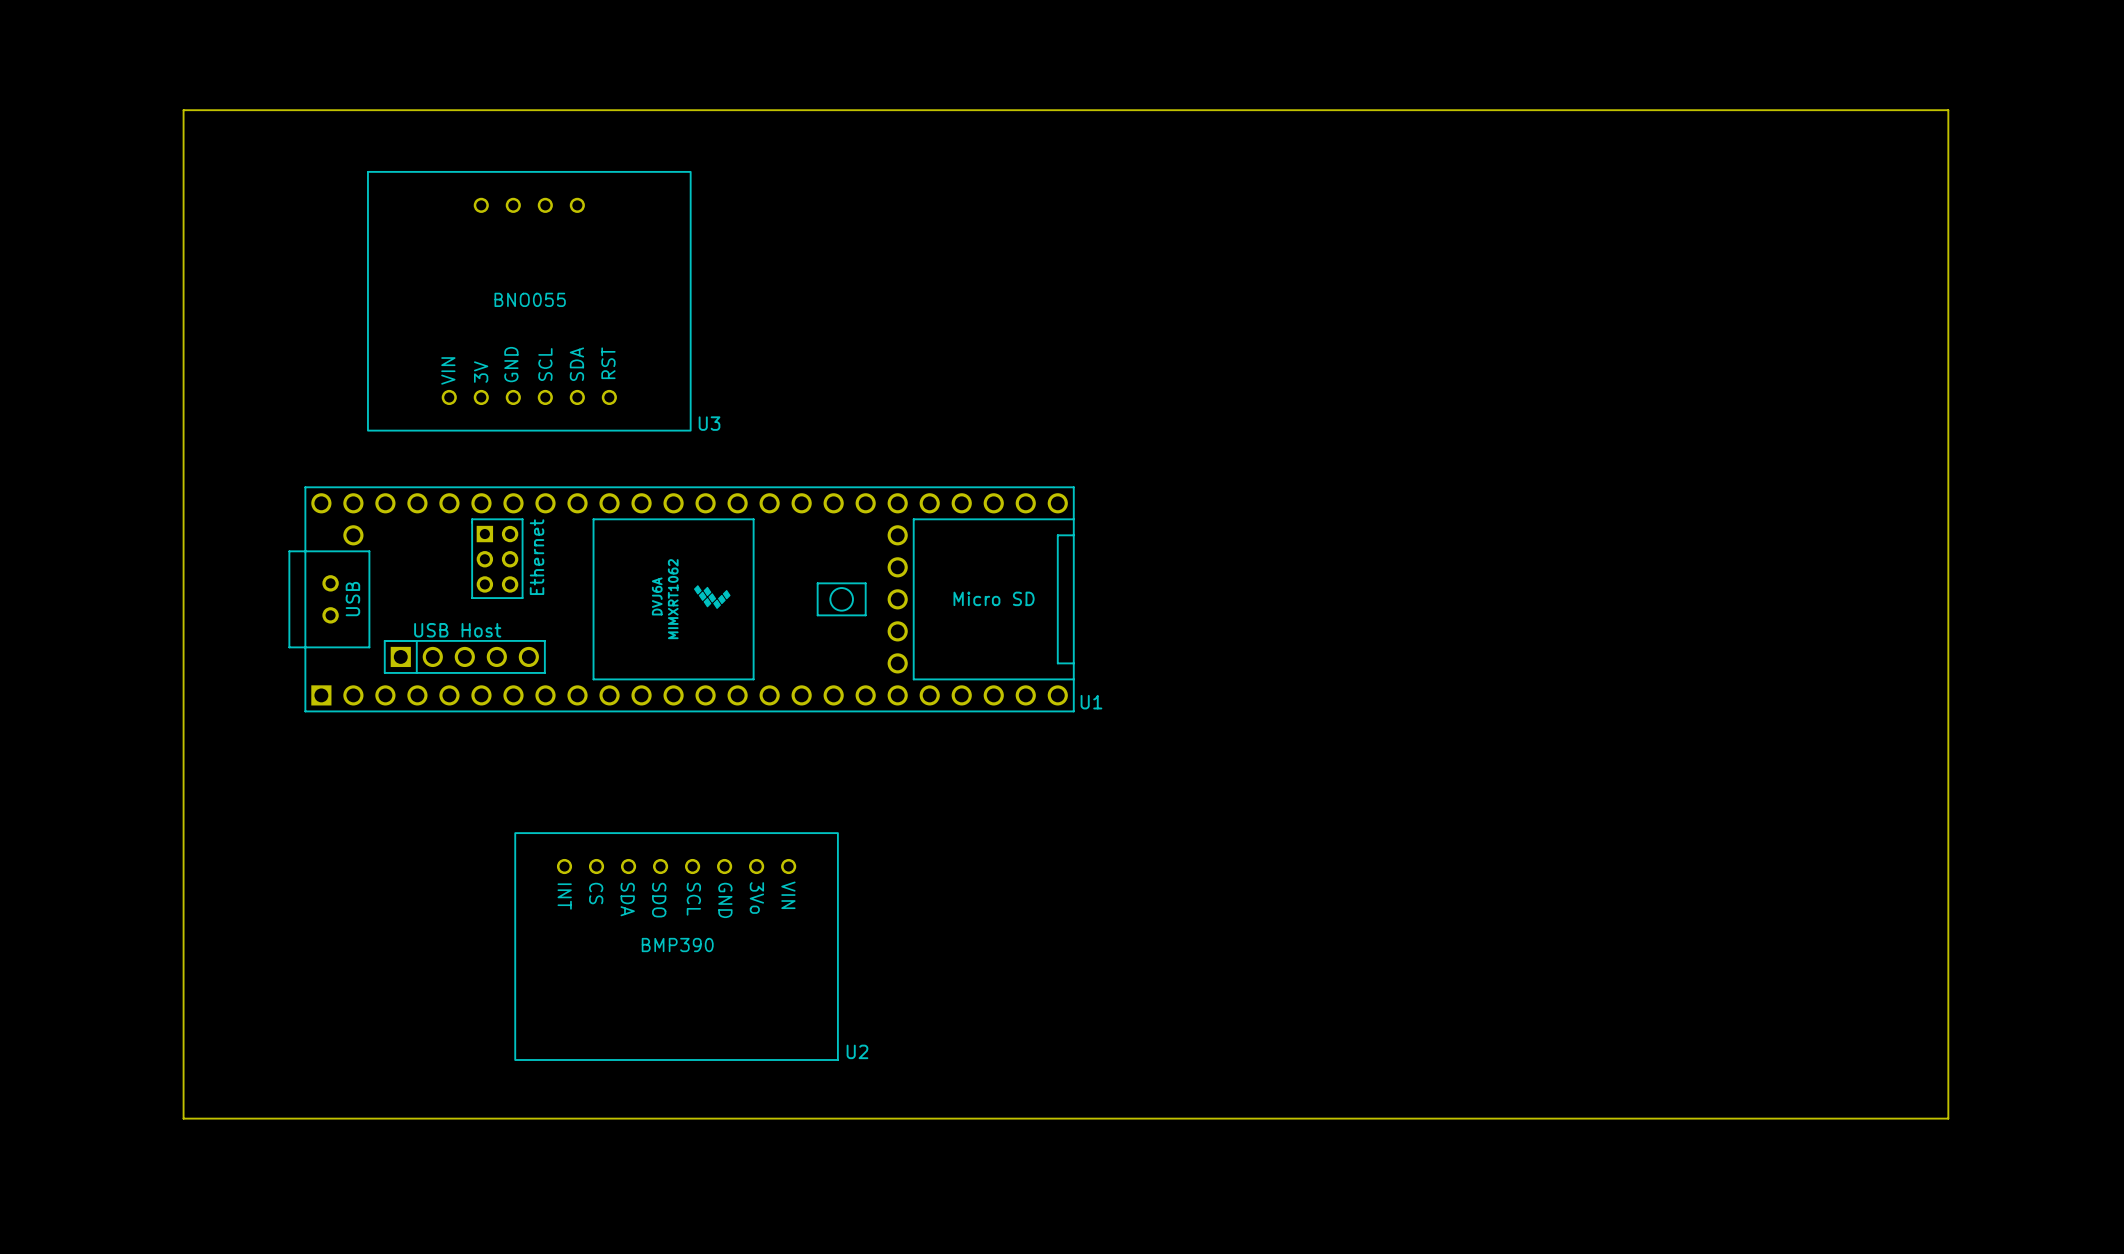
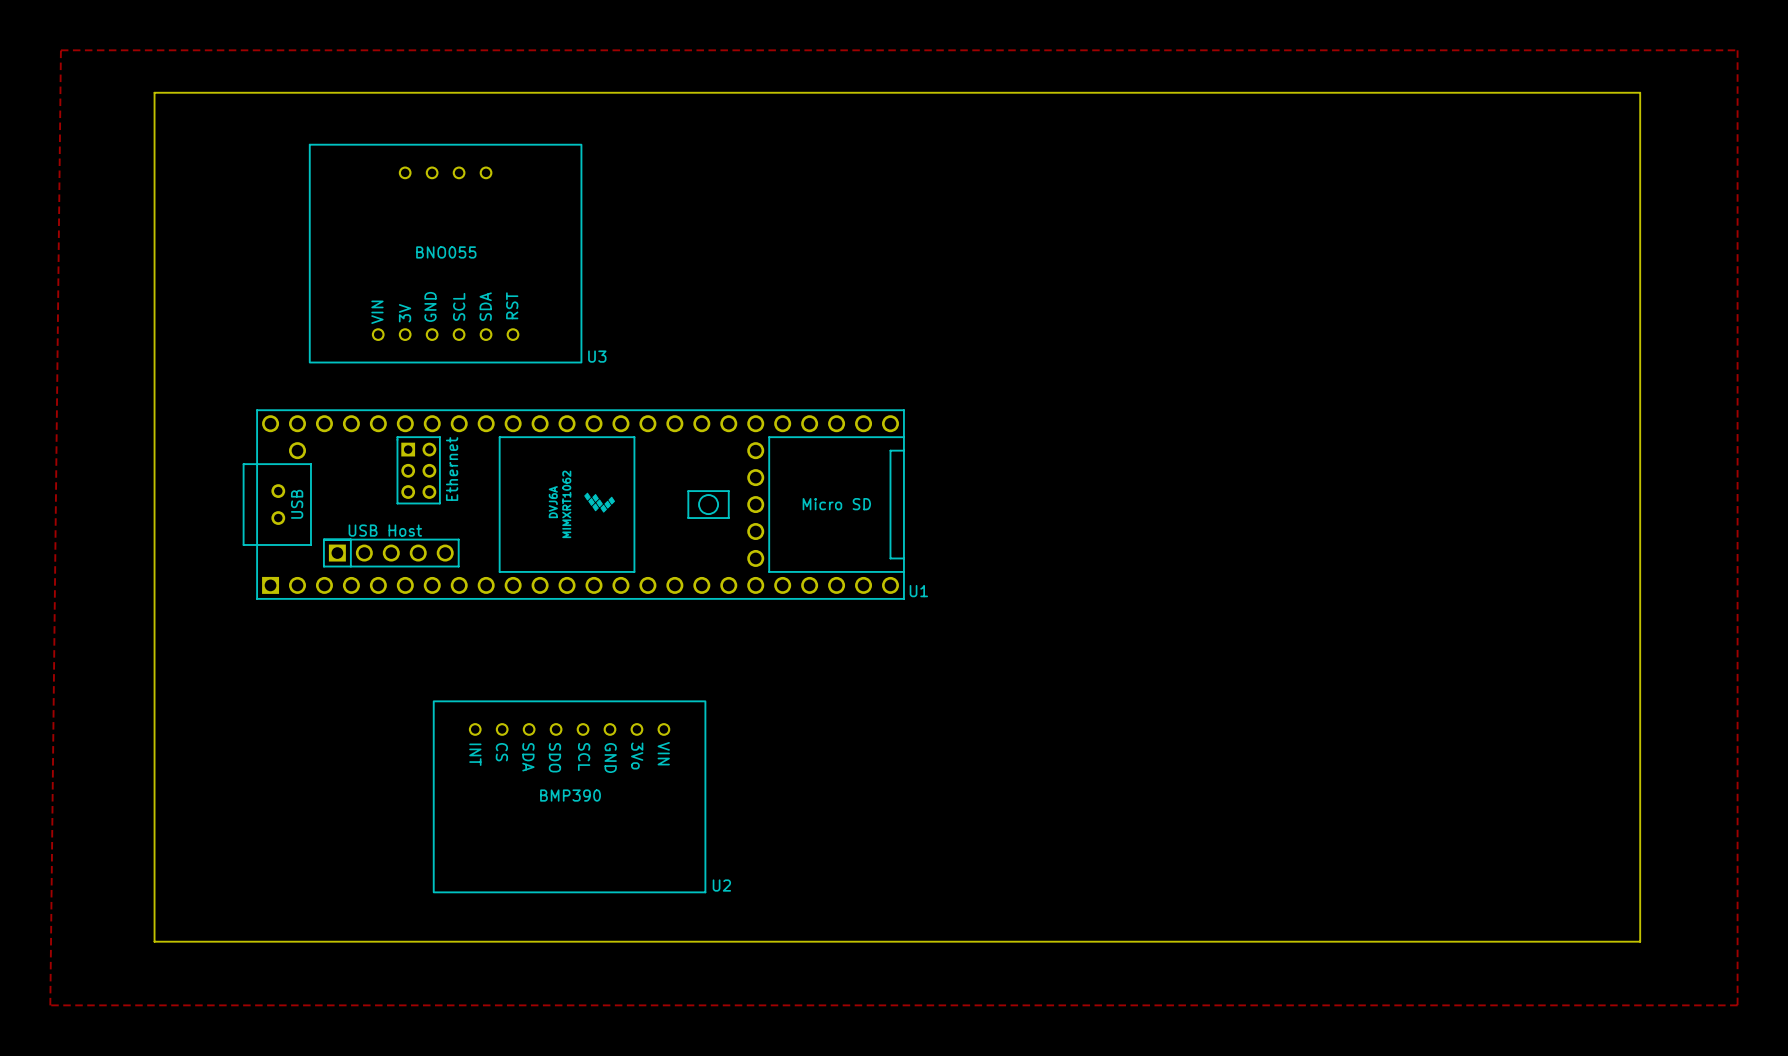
zone outline: none -> (60, 50) (1737, 50) (1737, 1005) (50, 1005) (60, 50)

